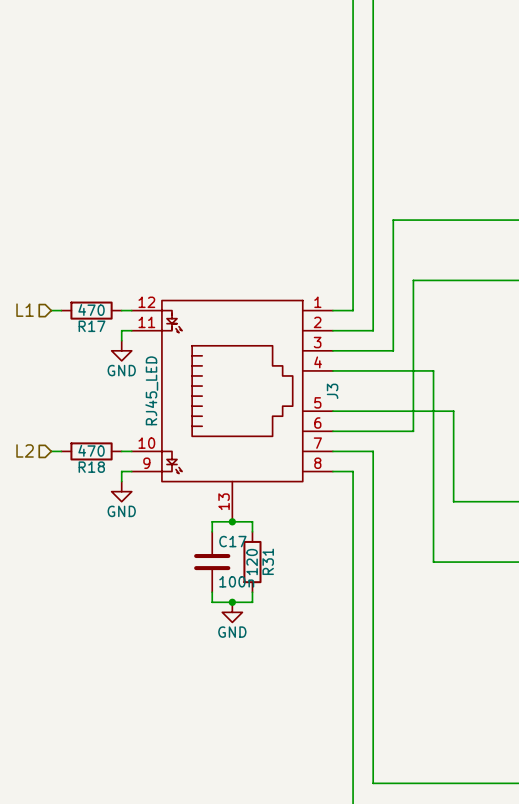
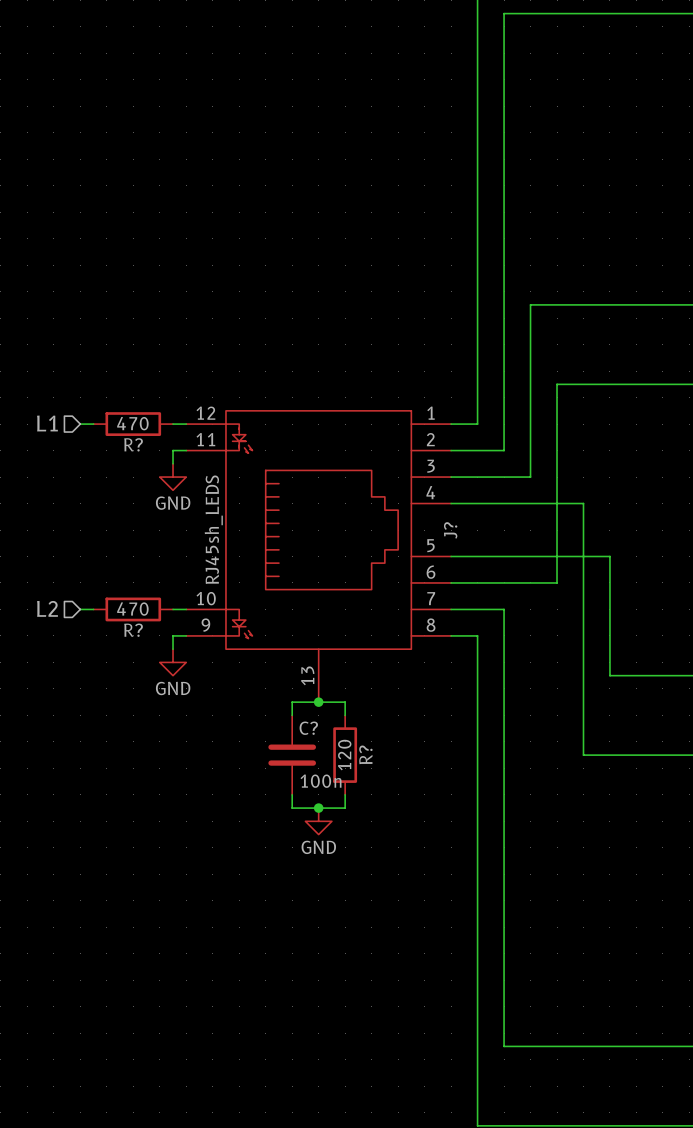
R17 name: R17 (92, 326) -> R? (133, 444)
J3 value: RJ45_LED (151, 390) -> RJ45sh_LEDS (213, 529)
J3 name: J3 (332, 391) -> J? (450, 530)
R18 name: R18 (91, 467) -> R? (133, 630)
C17 name: C17 (232, 541) -> C? (308, 728)
R31 name: R31 (268, 561) -> R? (365, 754)

